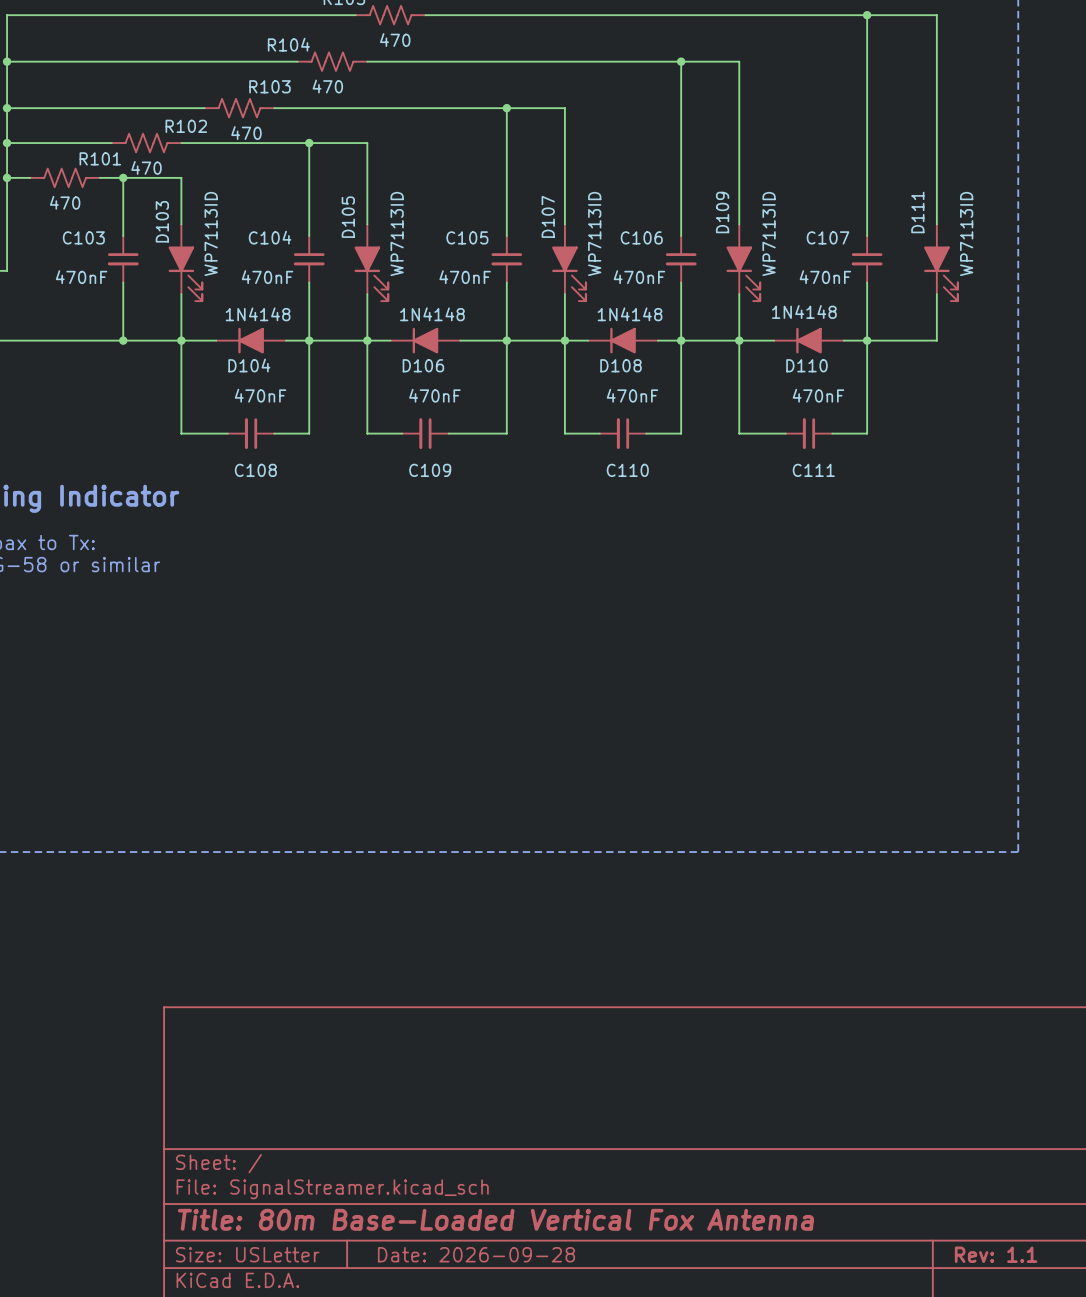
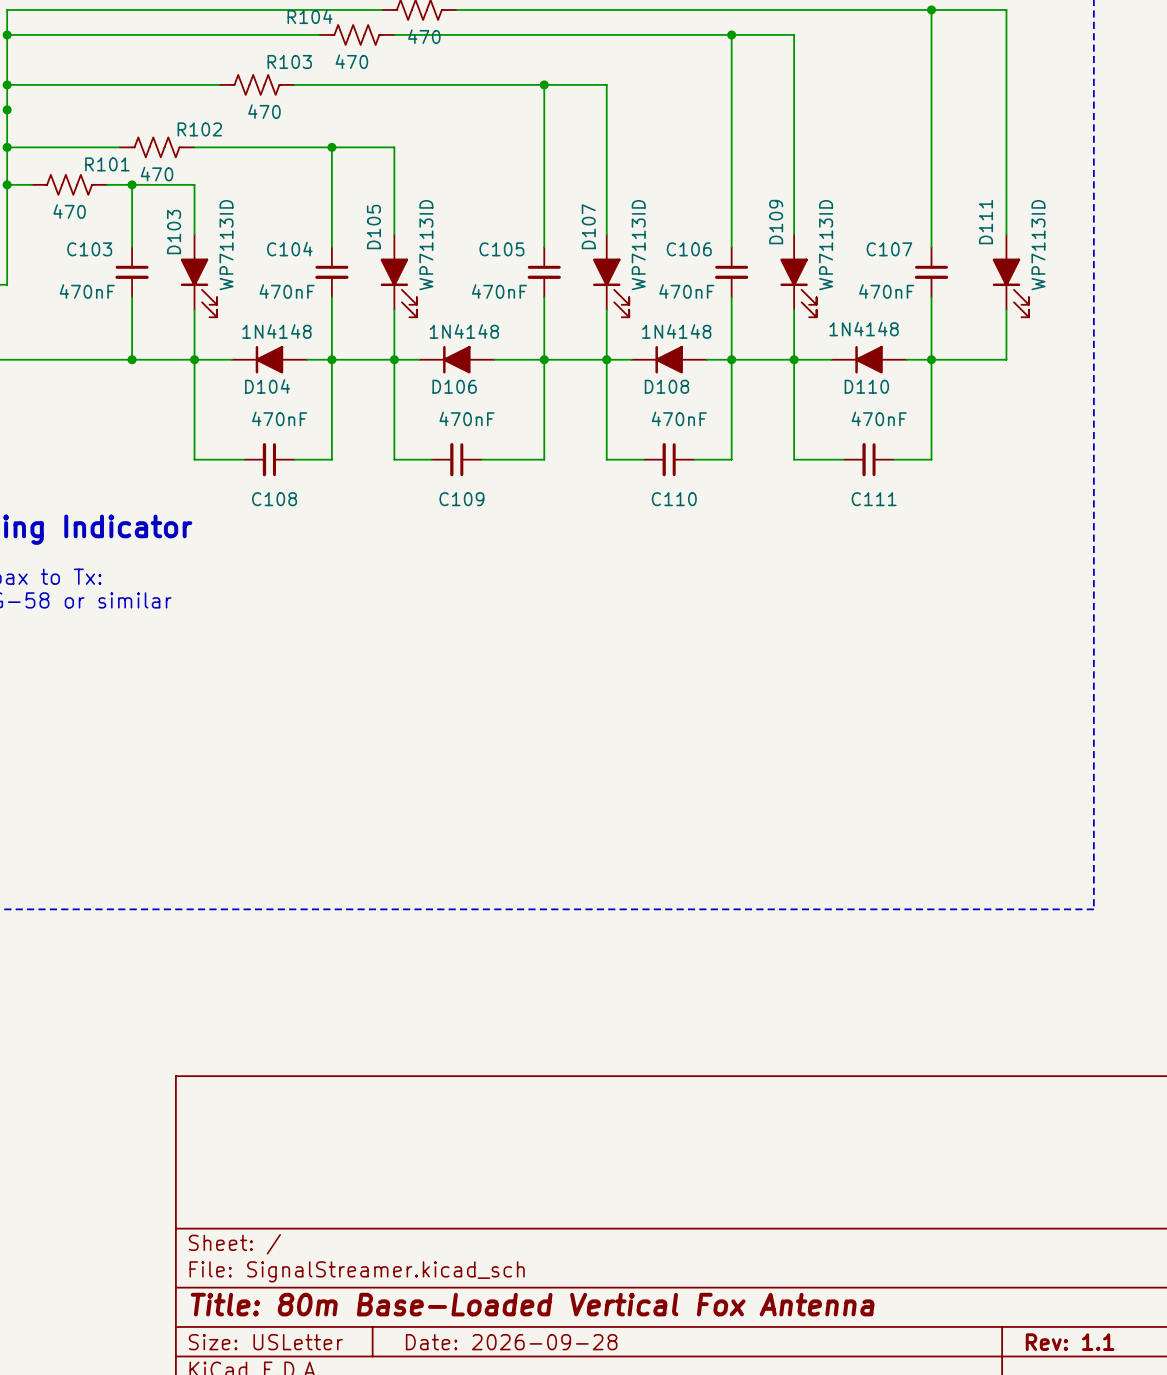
junction: none -> (7, 34)
wire: none -> (731, 34) (731, 59)
wire: (7, 61) (297, 61) -> (7, 34) (319, 34)
junction: (7, 61) -> none
R104 position: (332, 61) -> (356, 34)
wire: (367, 61) (739, 61) -> (394, 34) (794, 34) (794, 59)
junction position: (681, 61) -> (731, 34)
junction: none -> (7, 84)
wire: none -> (544, 84) (544, 109)
wire: (7, 108) (204, 108) -> (7, 84) (219, 84)
R103 position: (239, 108) -> (256, 84)
wire: (274, 108) (564, 108) -> (294, 84) (606, 84) (606, 109)
junction position: (506, 108) -> (544, 84)

